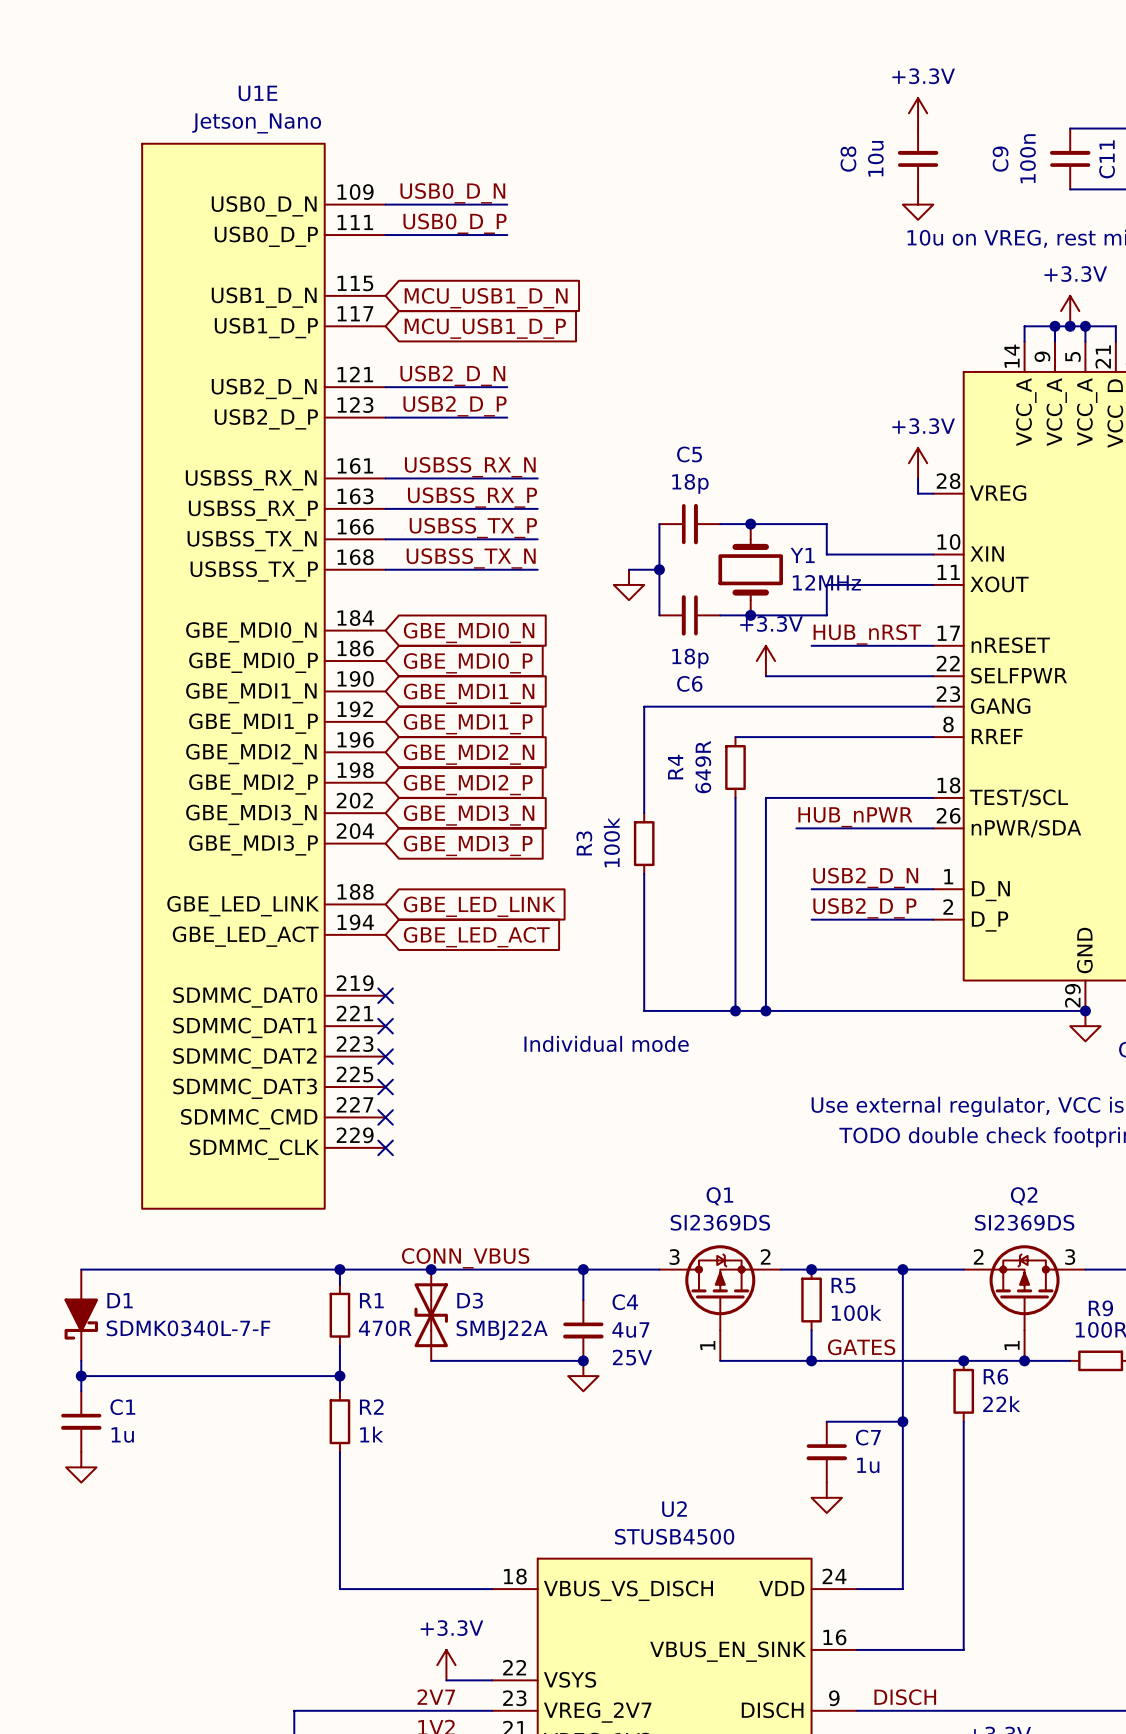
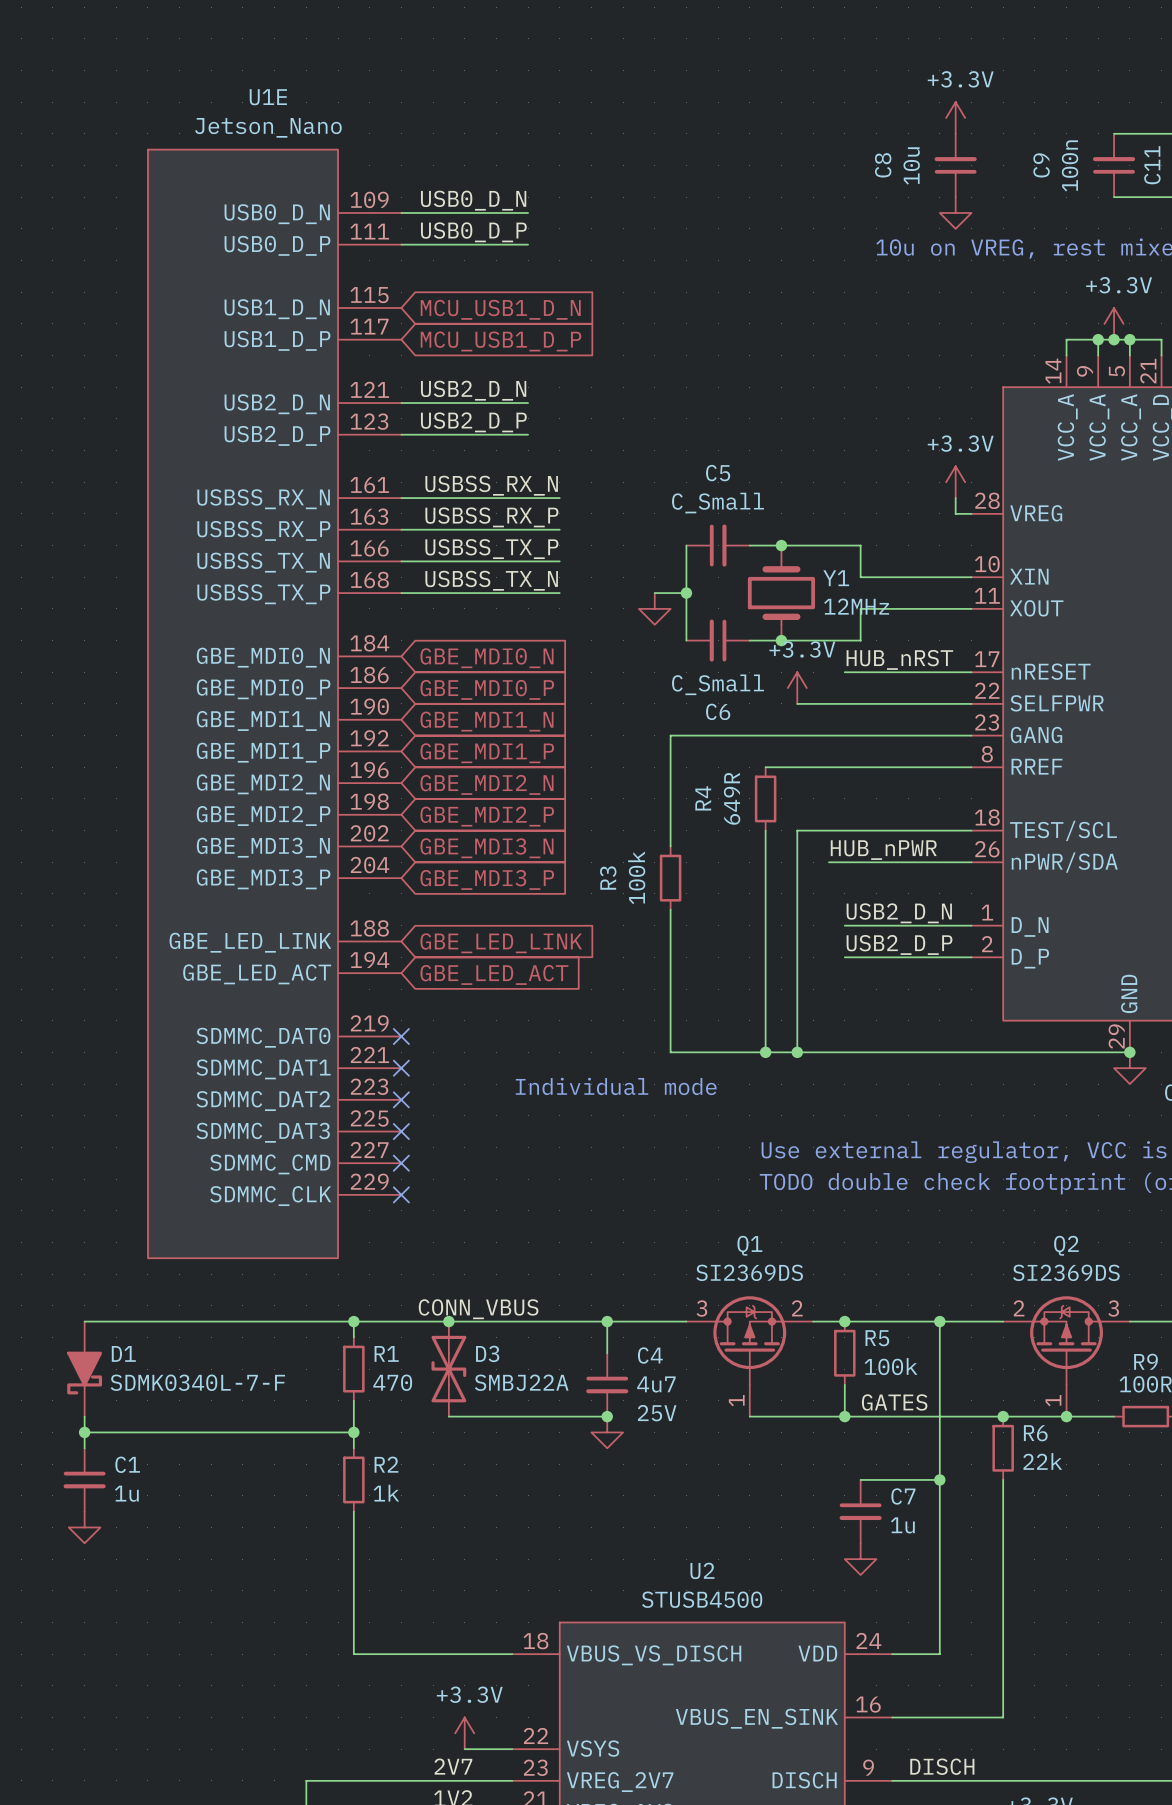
C5 value: 18p (690, 483) -> C_Small (717, 503)
C6 value: 18p (690, 658) -> C_Small (717, 684)
R1 value: 470R (385, 1328) -> 470 (392, 1382)

